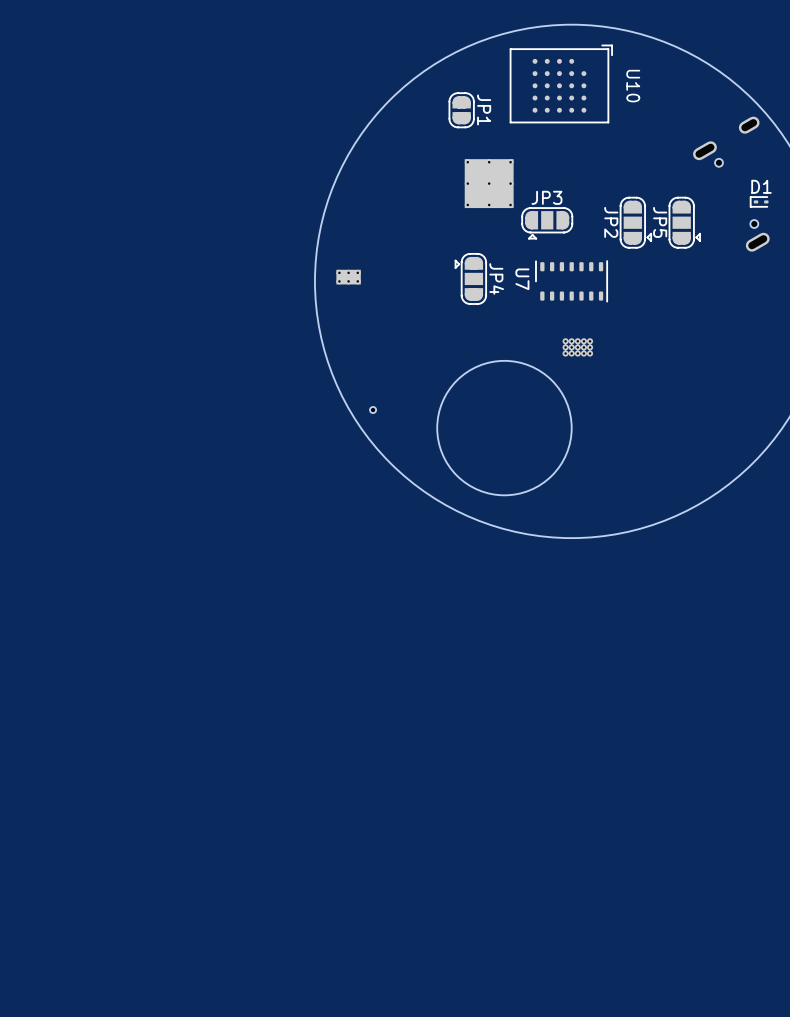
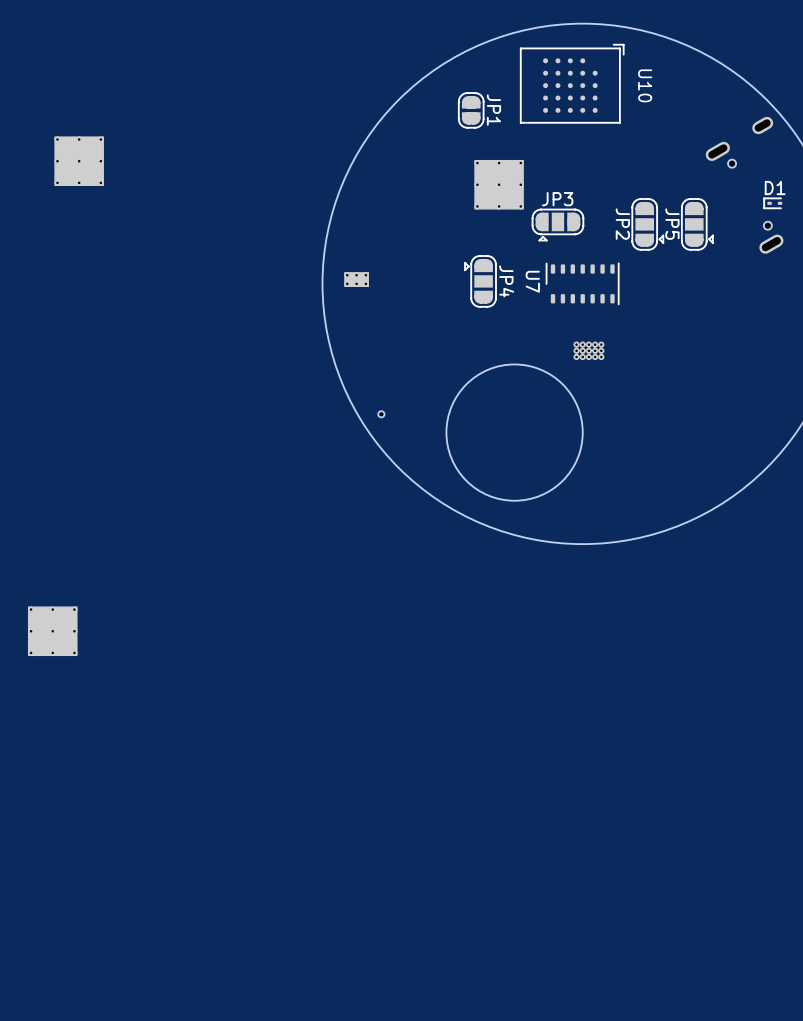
part: none -> (79, 161)
part: none -> (52, 631)

